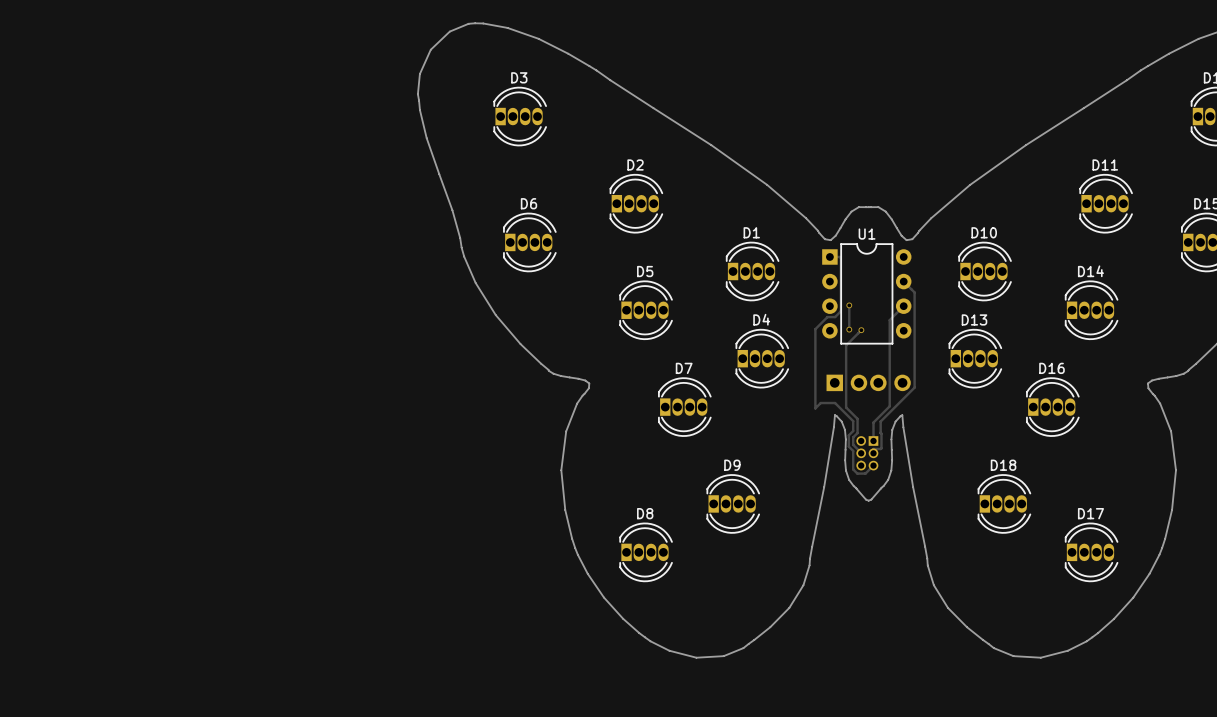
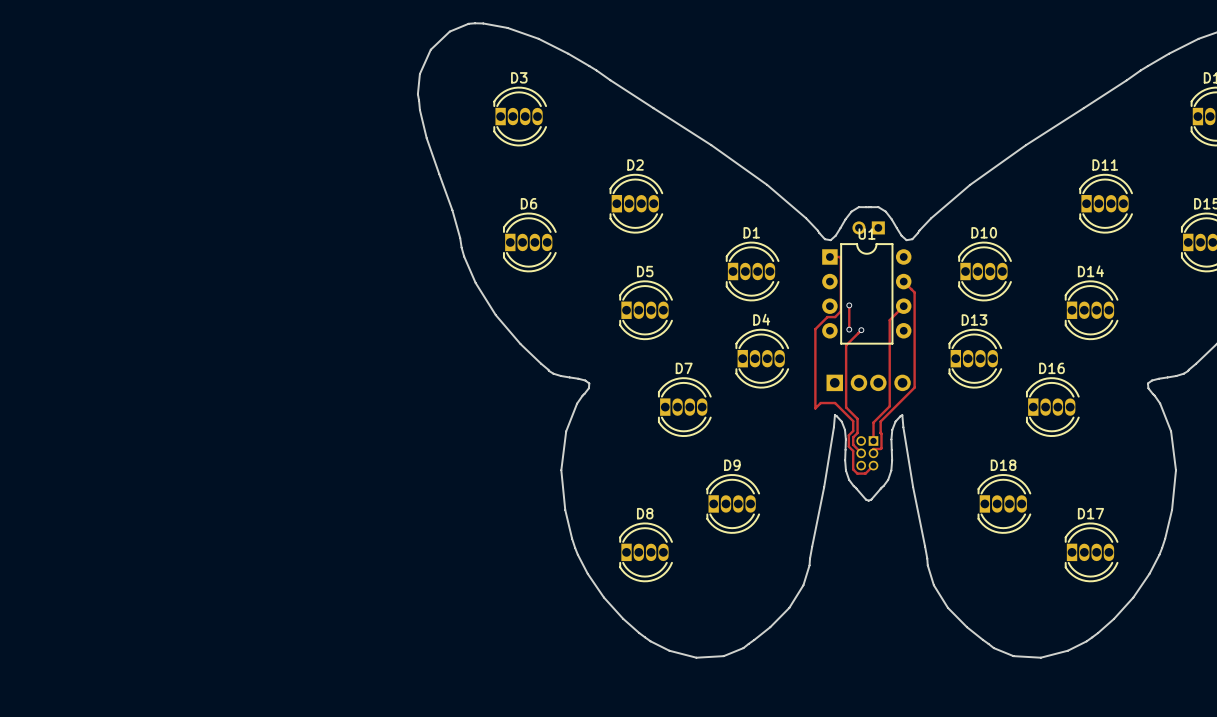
part: none -> (868, 227)

